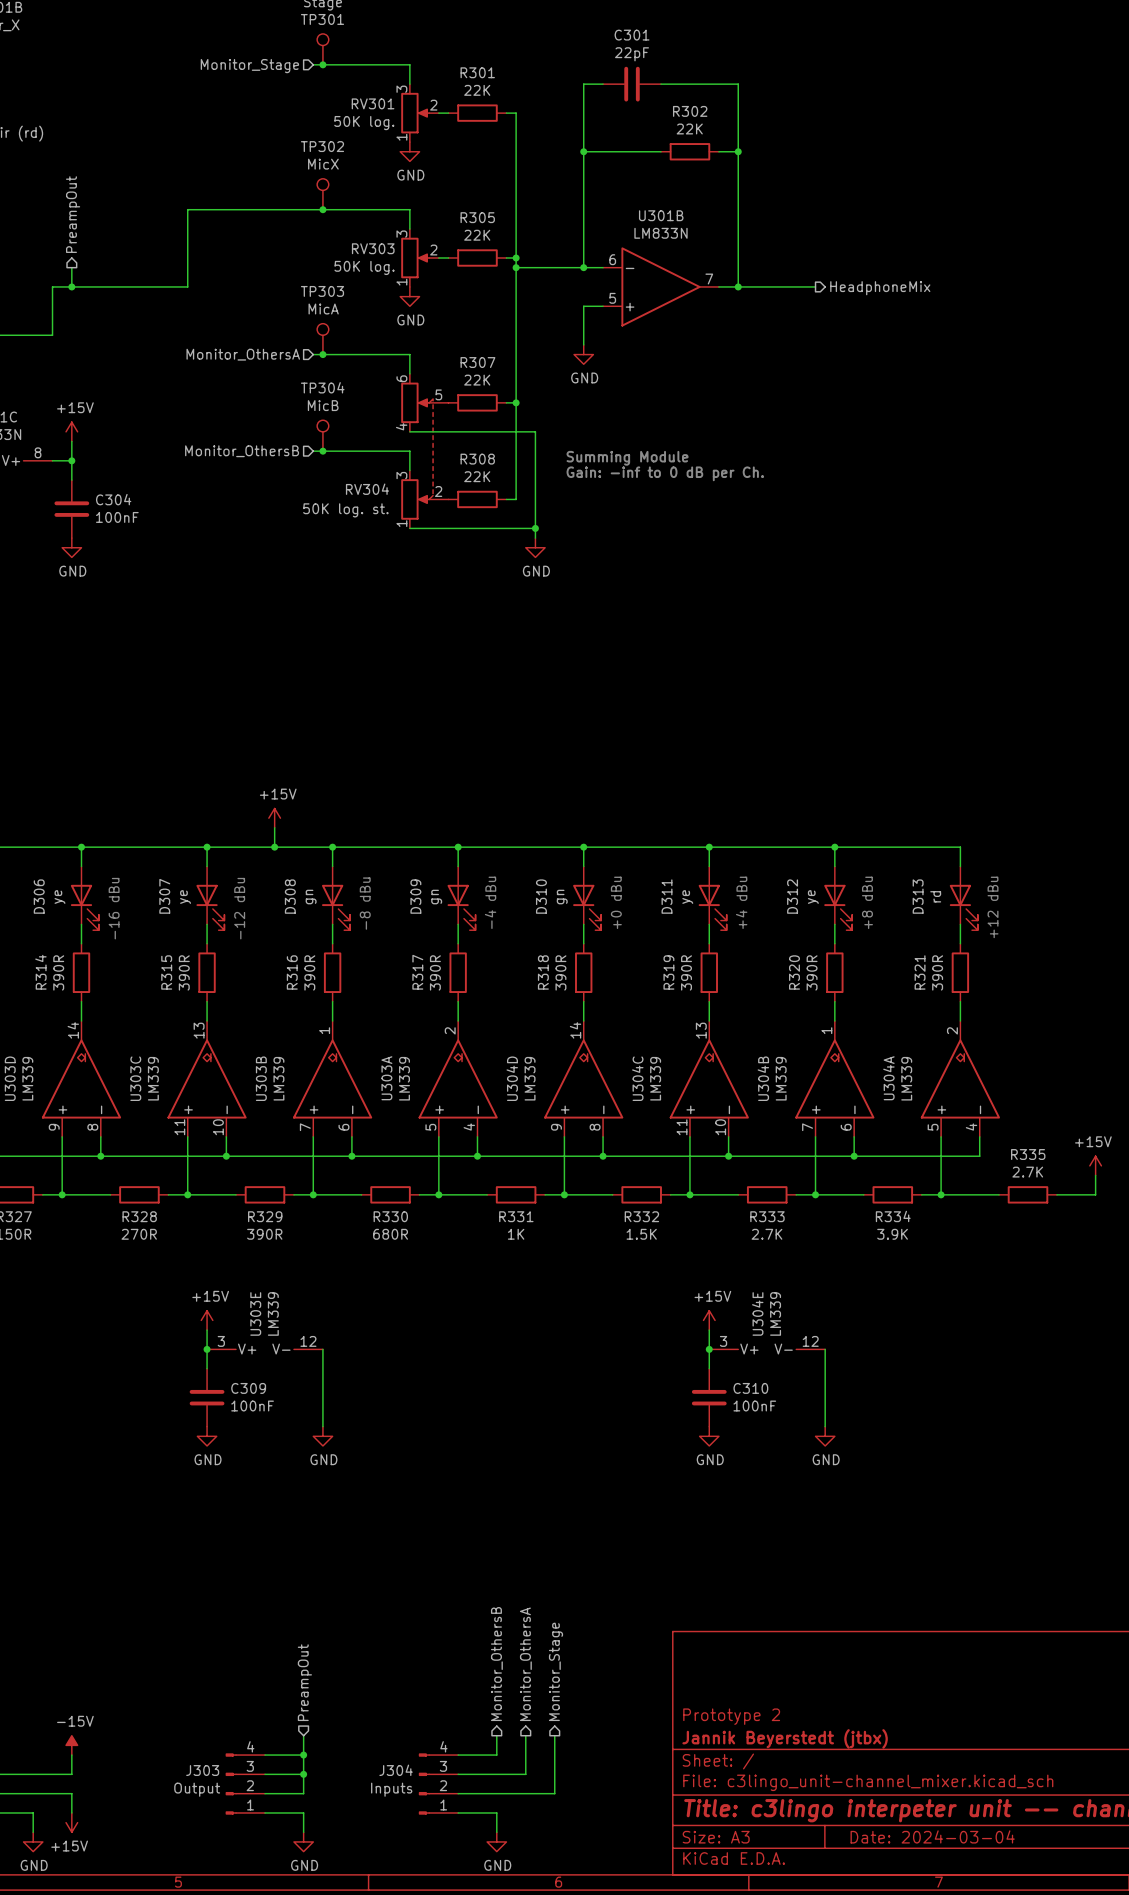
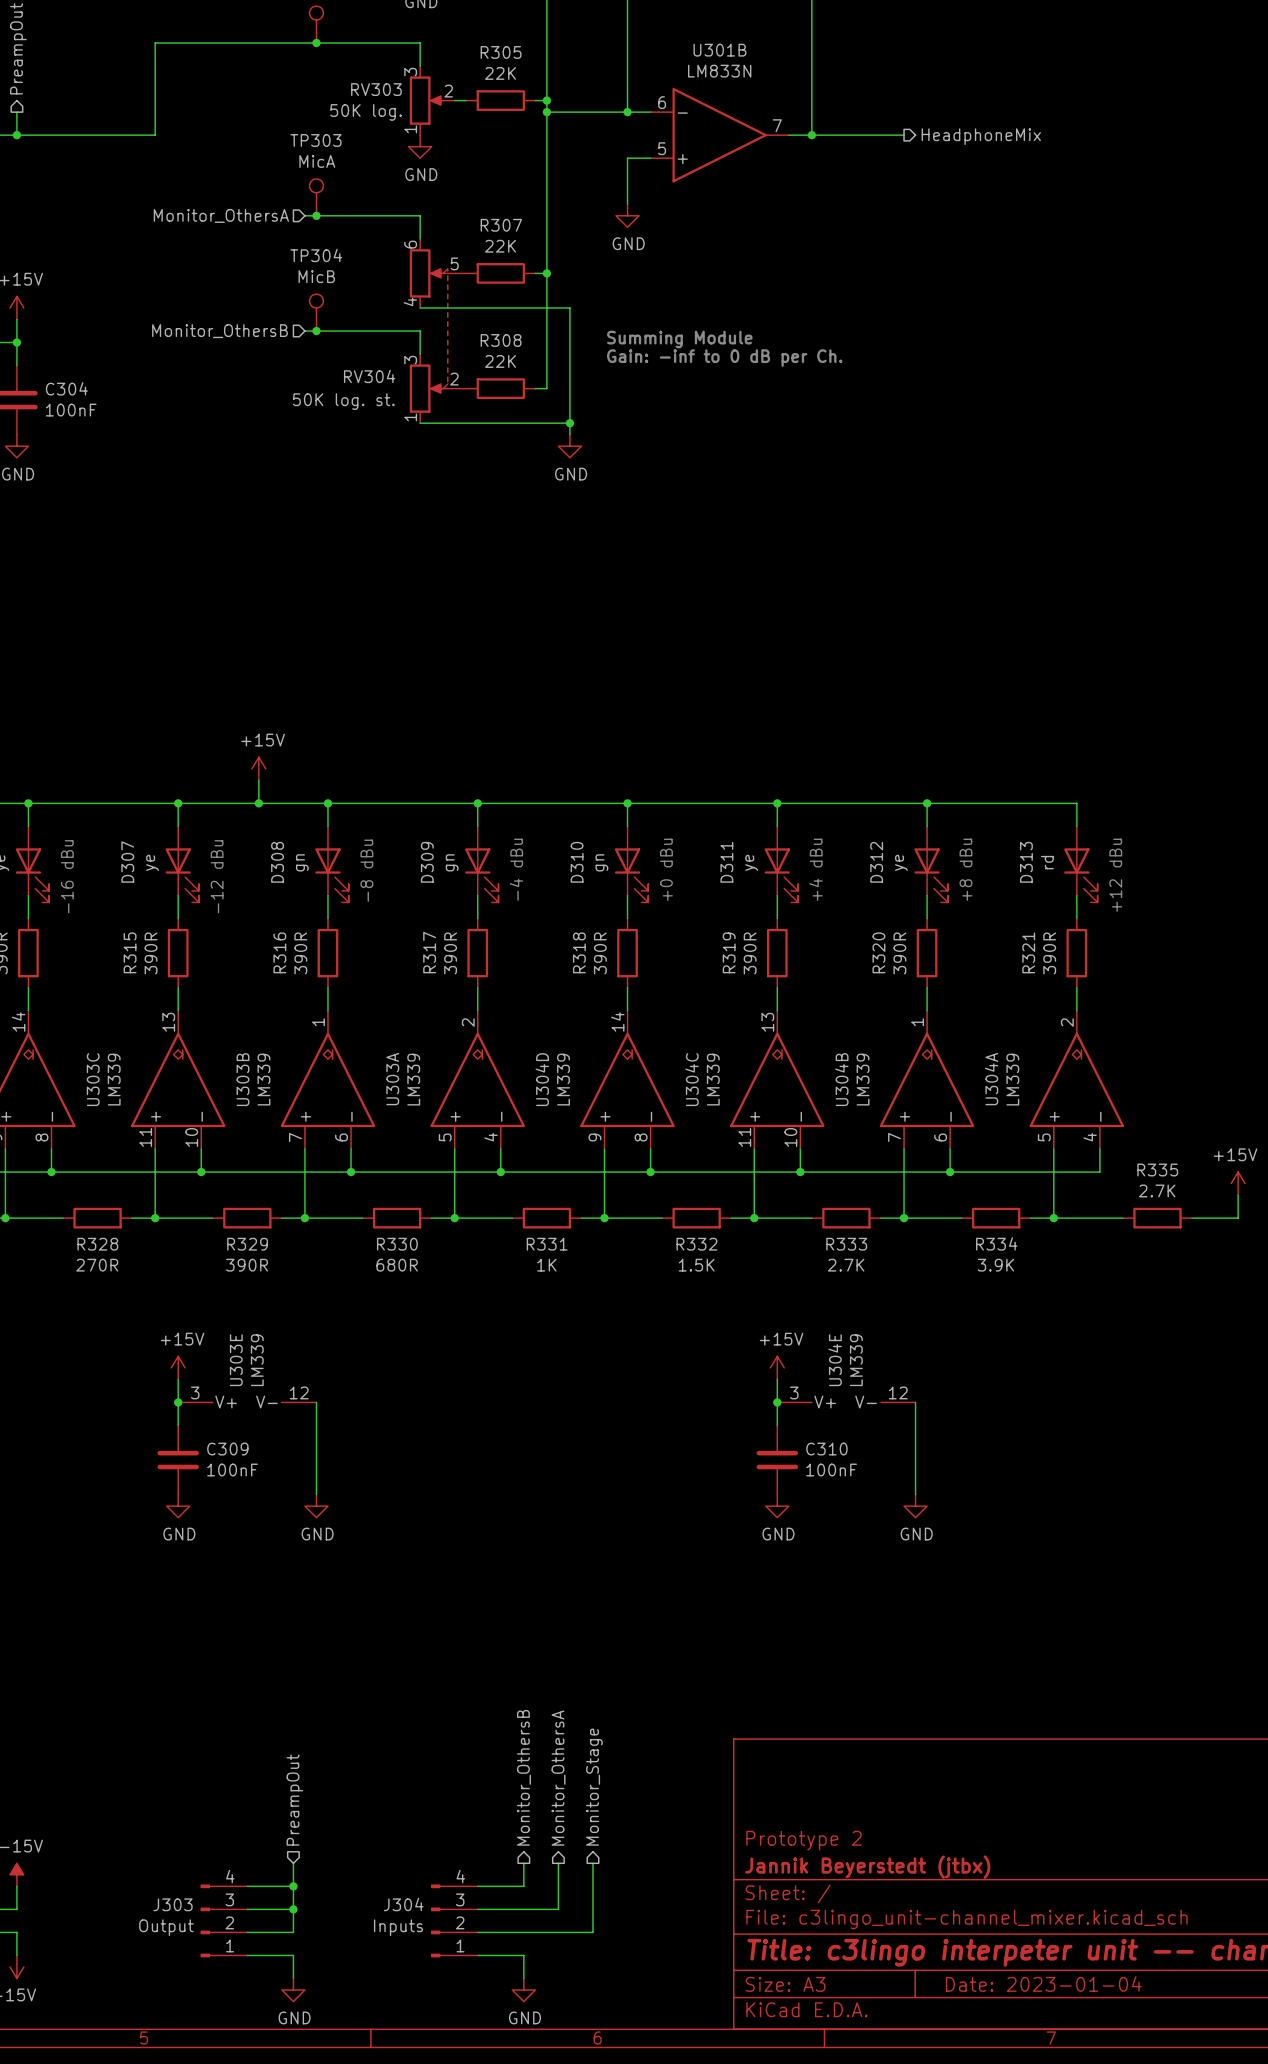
title block: Date: 2024-03-04 (932, 1836) -> Date: 2023-01-04 (1043, 1984)

